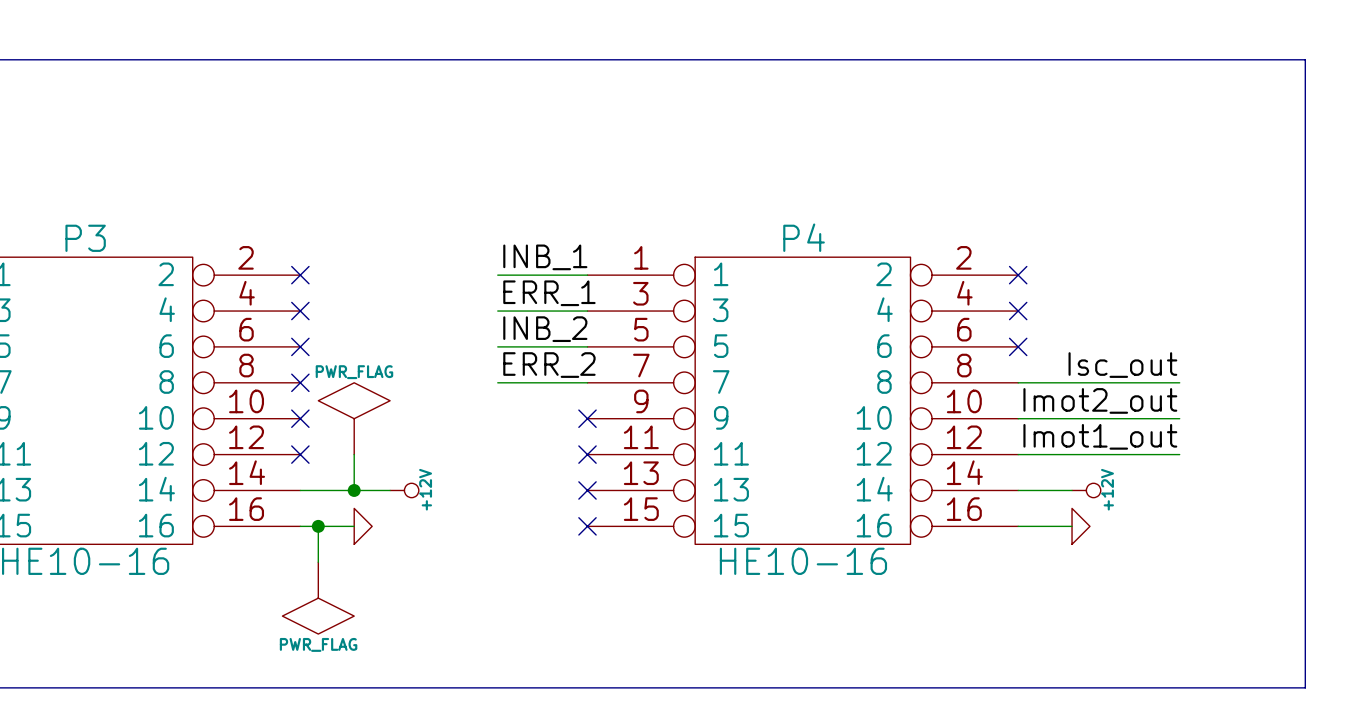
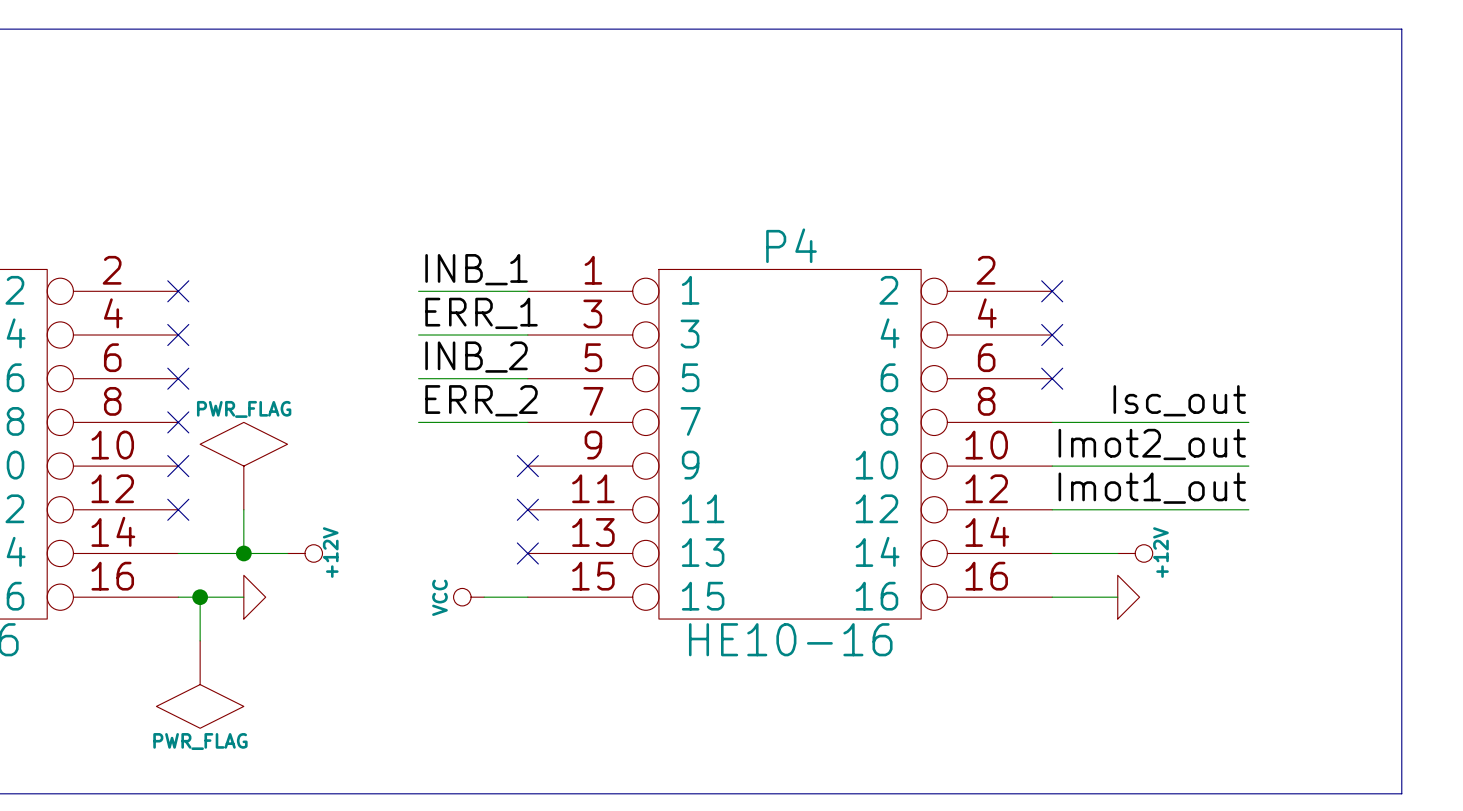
power symbol: none -> VCC (468, 597)
wire: none -> (484, 597) (527, 597)
no-connect mark: (587, 526) -> none

